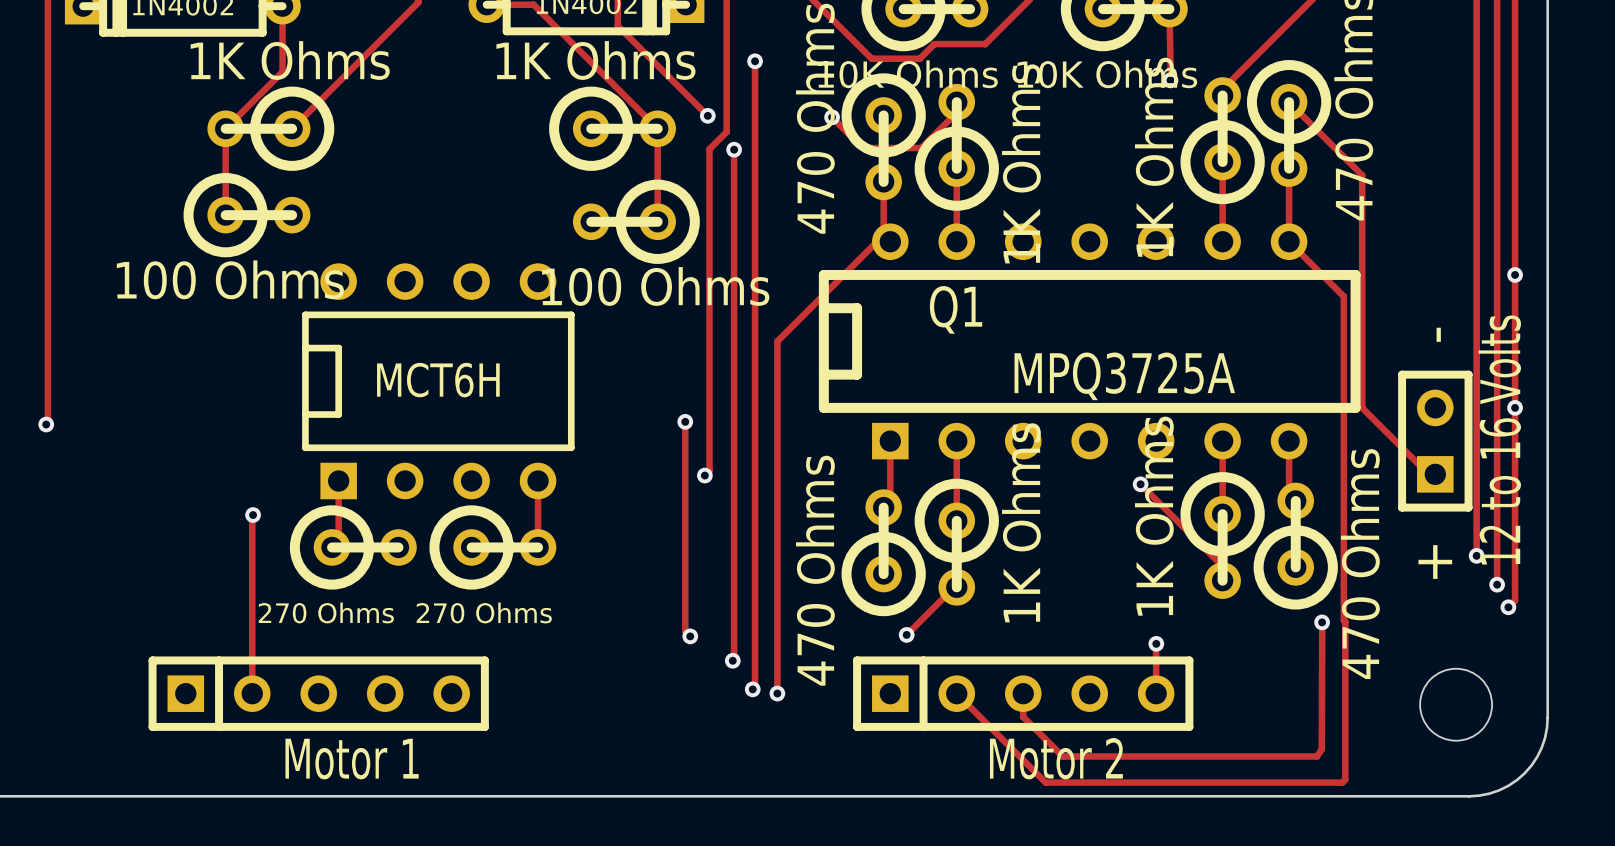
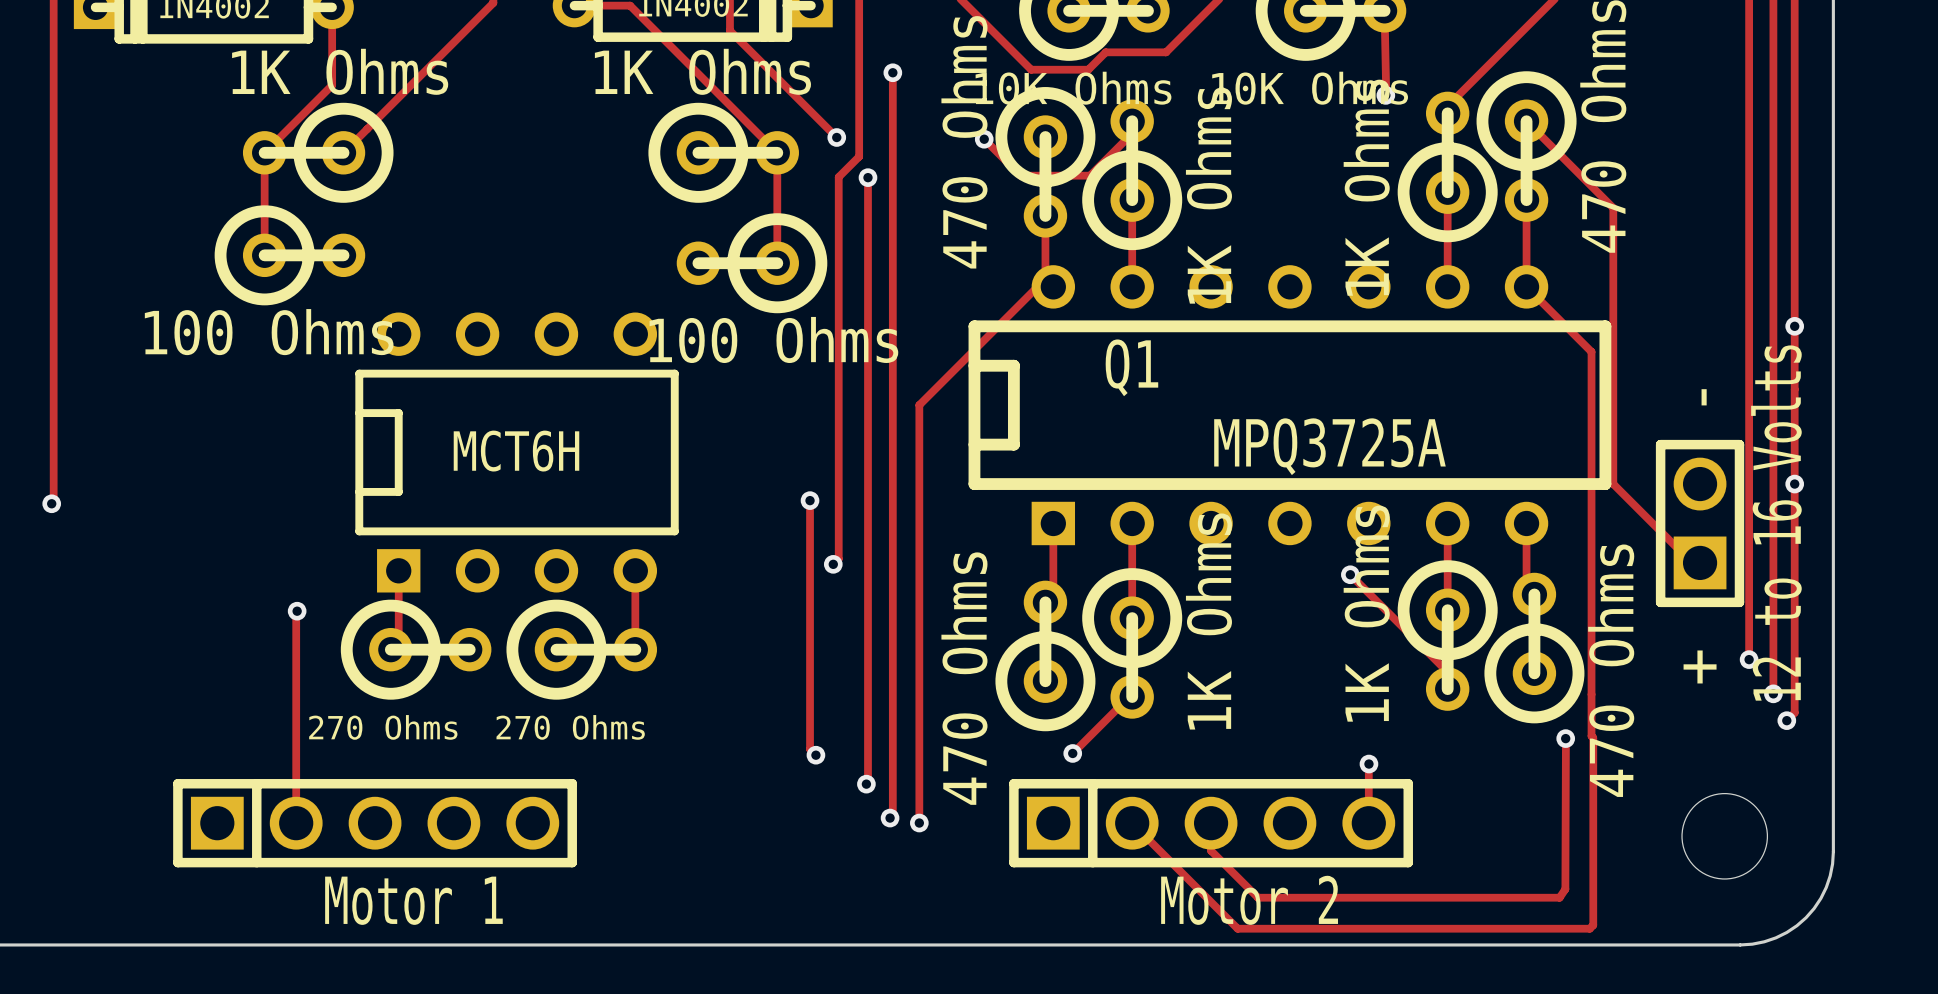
part footprint: [1398, 370, 1473, 512] -> [1655, 439, 1745, 608]
part footprint: [148, 656, 489, 731] -> [173, 779, 577, 868]
part footprint: [853, 656, 1194, 731] -> [1009, 779, 1413, 868]

